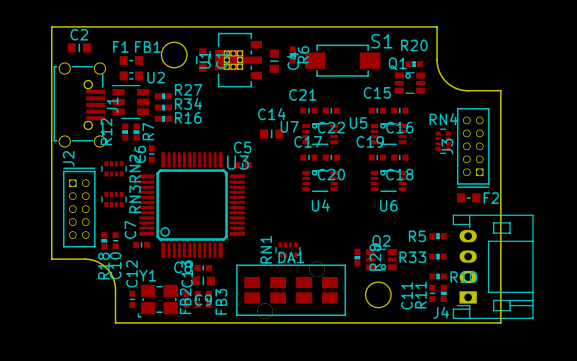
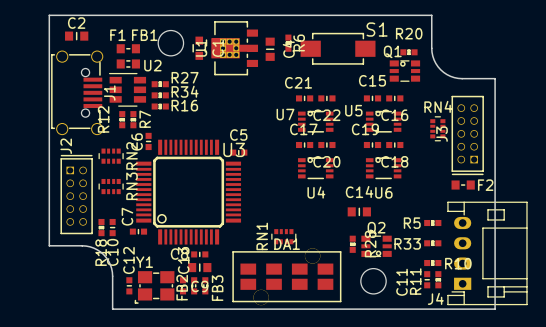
C14 position: (271, 134) -> (359, 211)

